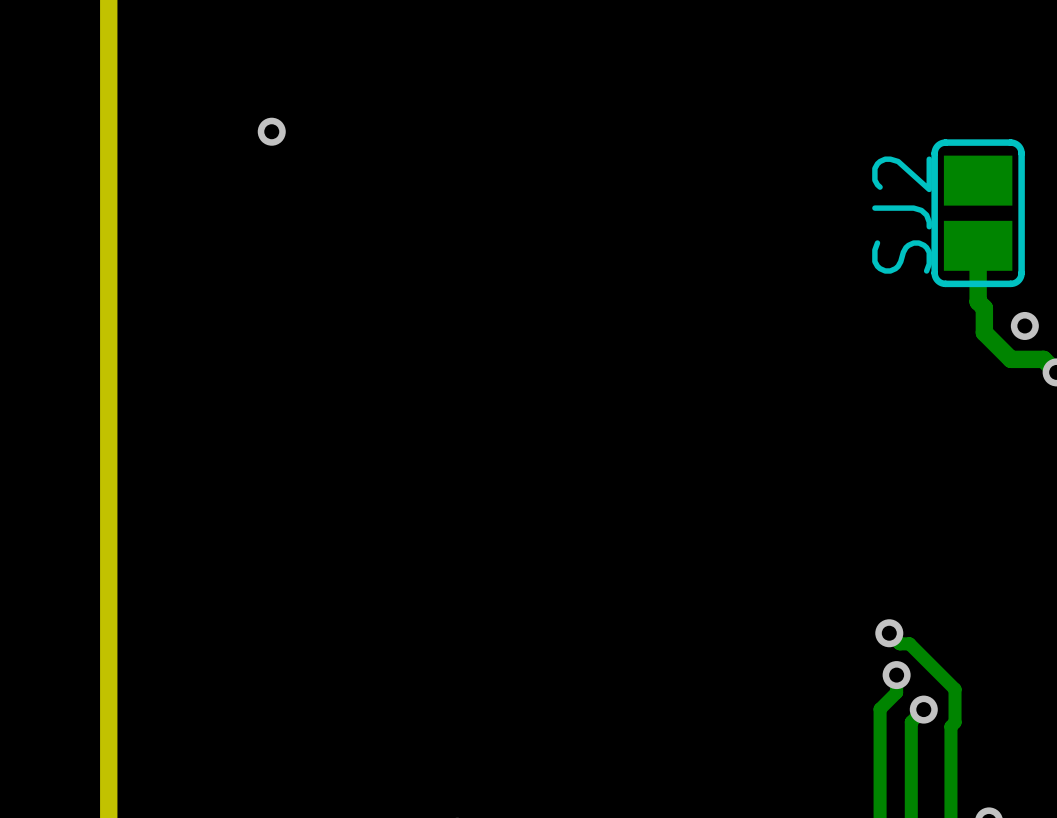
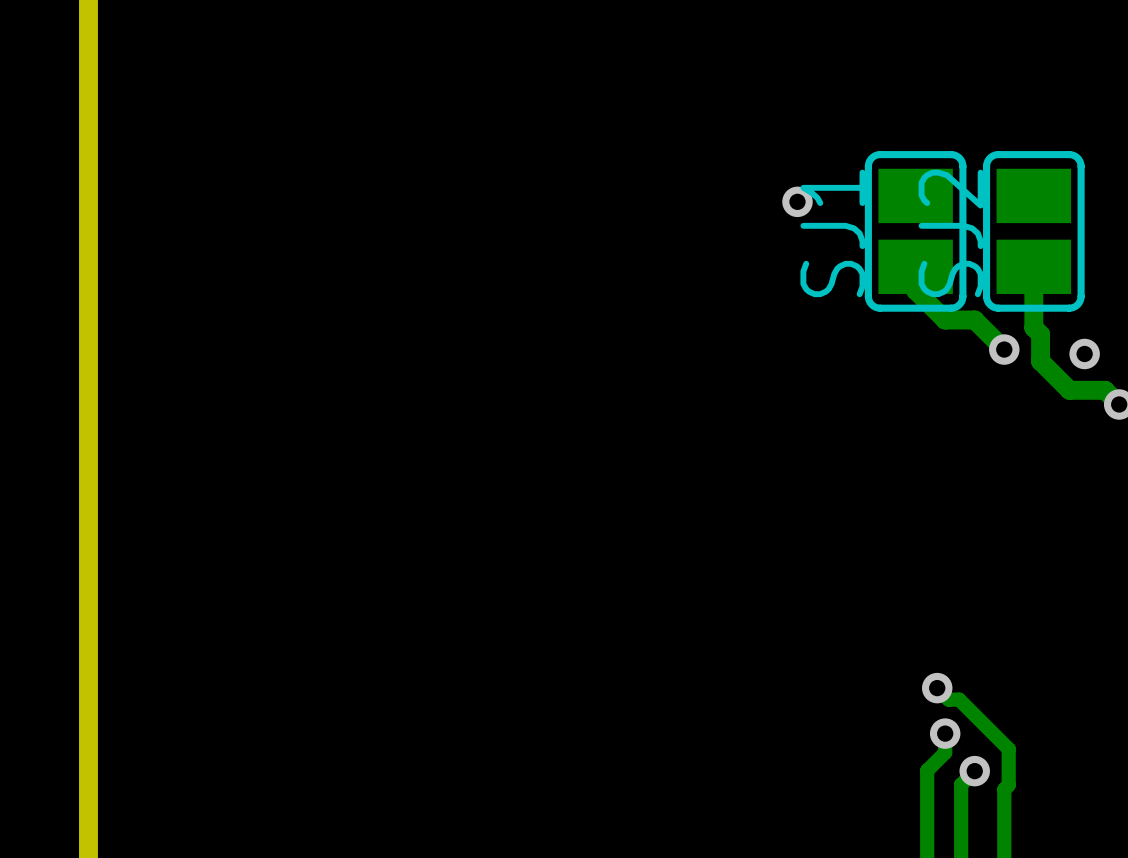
via: (271, 131) -> none
via: none -> (797, 201)
SJ1: none -> (915, 231)
track: none -> (915, 266) (915, 290) (945, 320) (974, 320) (1004, 349)
via: none -> (1004, 349)

